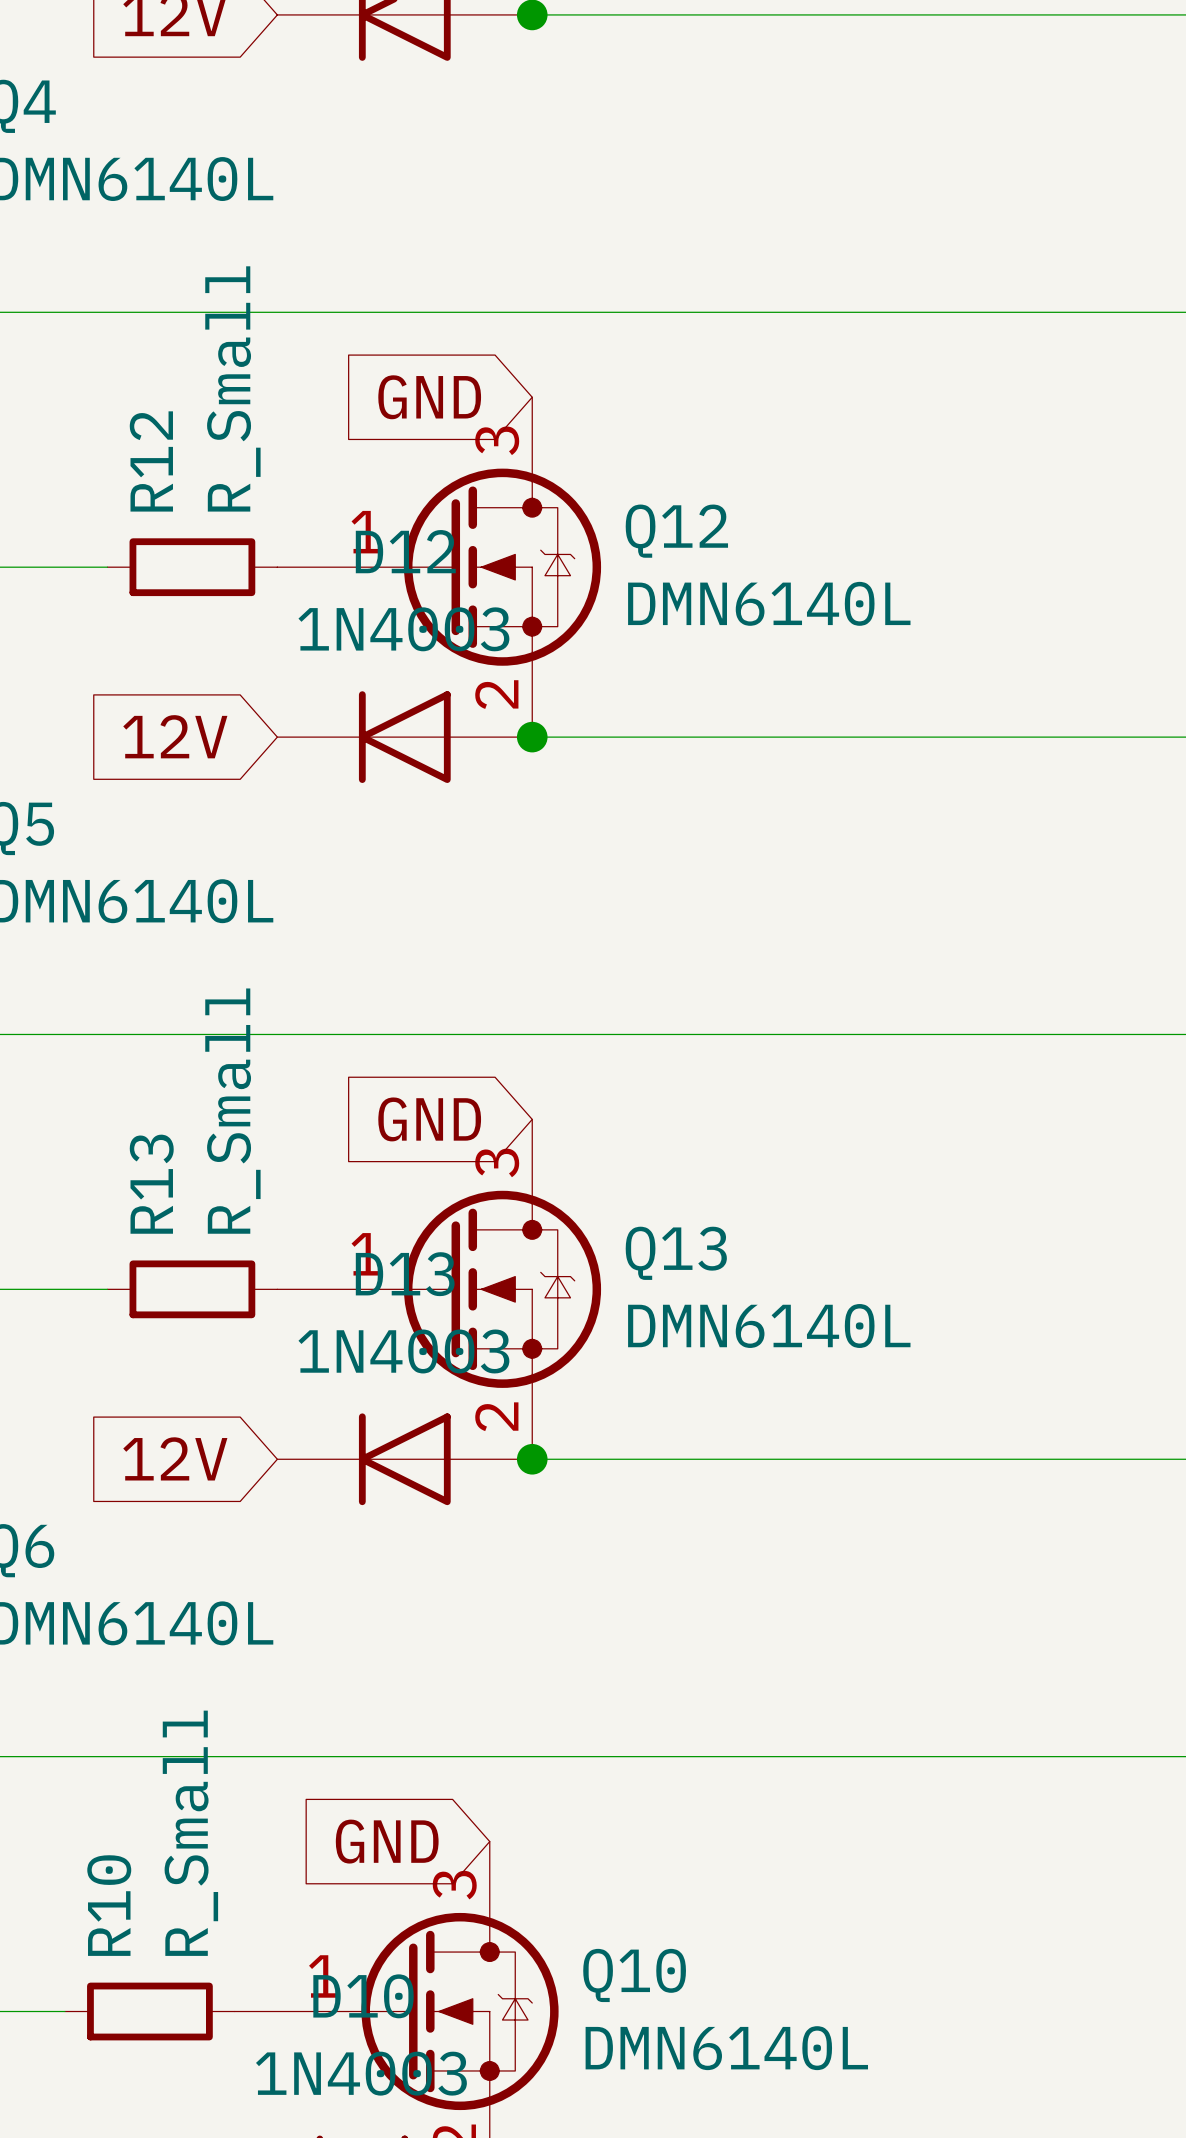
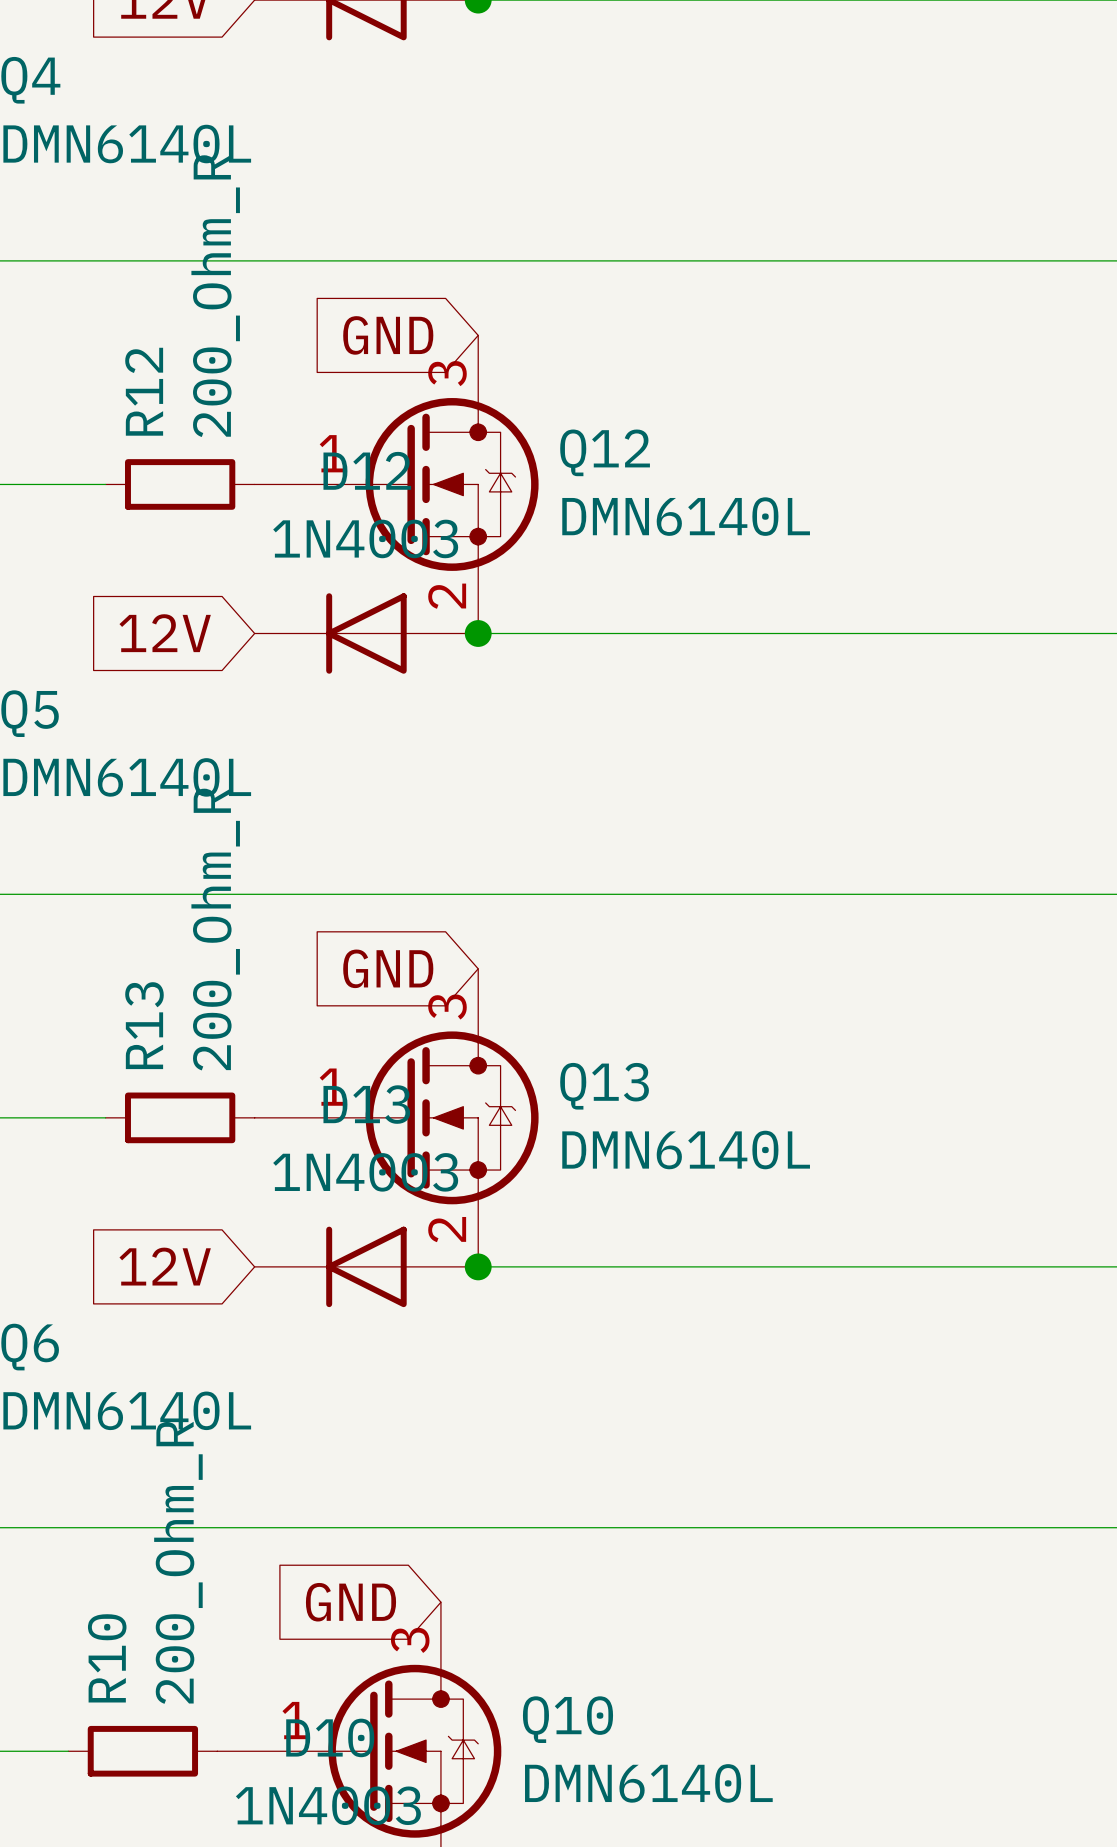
R12 value: R_Small (232, 388) -> 200_Ohm_R (215, 295)
R13 value: R_Small (232, 1111) -> 200_Ohm_R (215, 929)
R10 value: R_Small (190, 1833) -> 200_Ohm_R (178, 1562)

